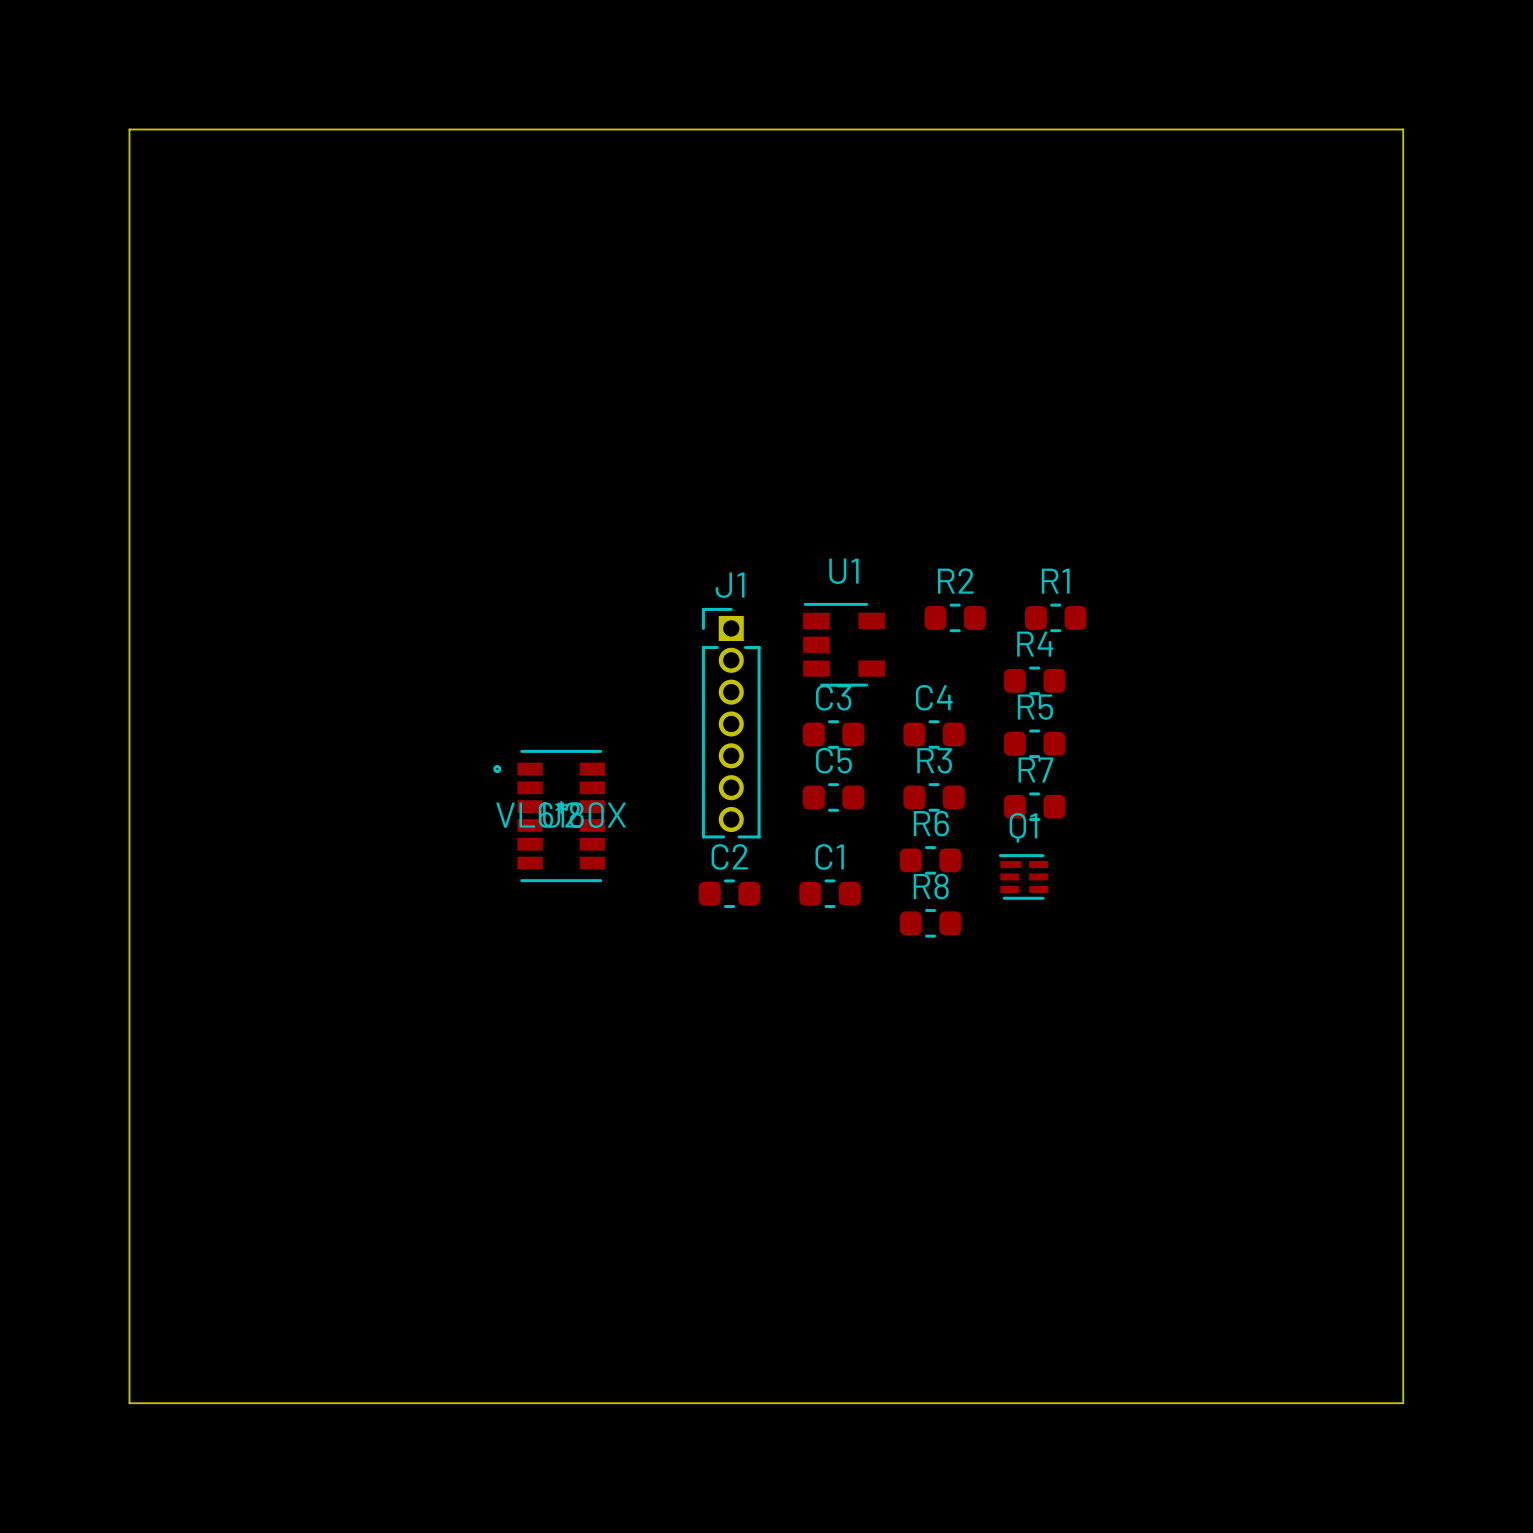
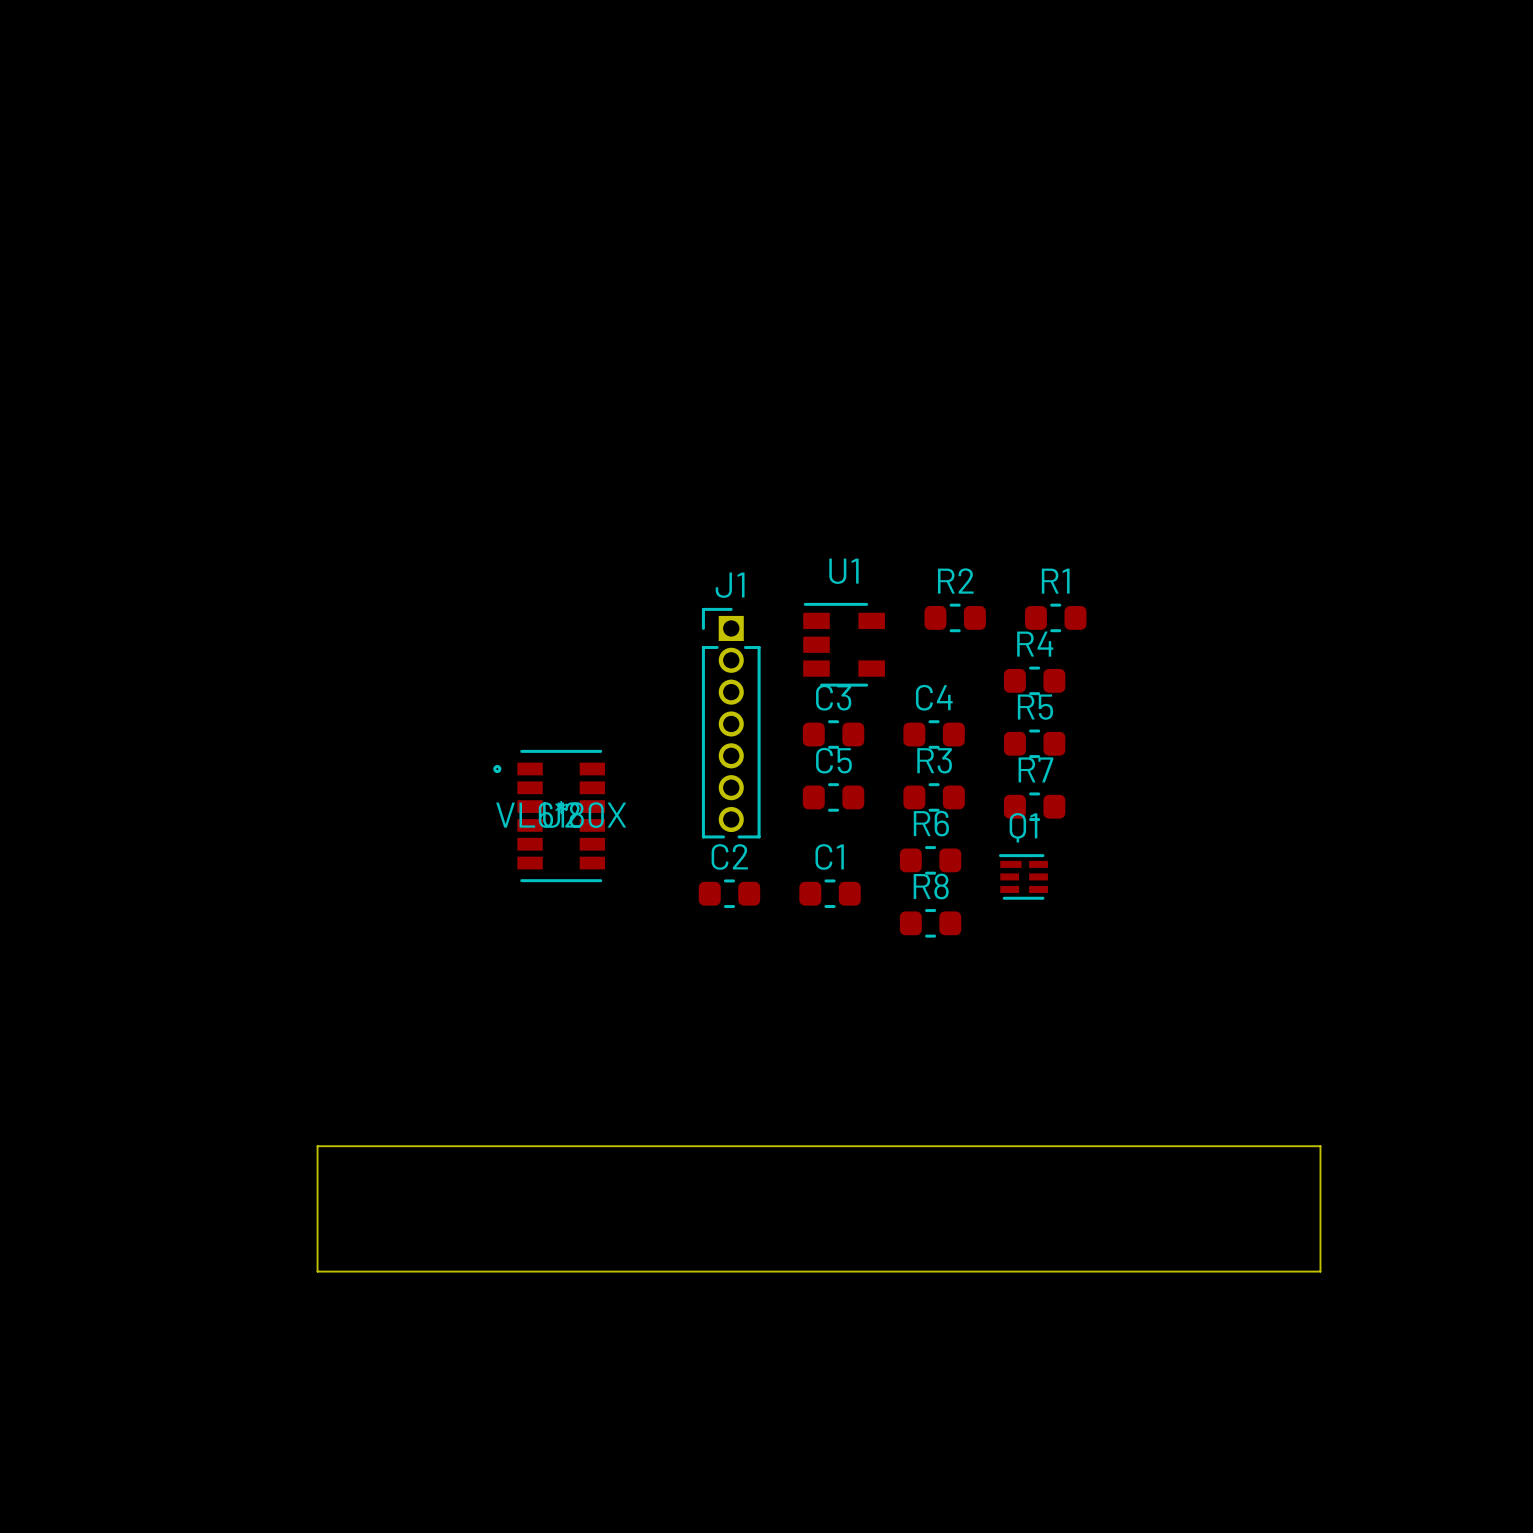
board edge: (129, 129) (129, 1403) (1403, 1403) (1403, 129) (129, 129) -> none
board edge: none -> (317, 1146) (1320, 1146) (1320, 1271) (317, 1271) (317, 1146)

